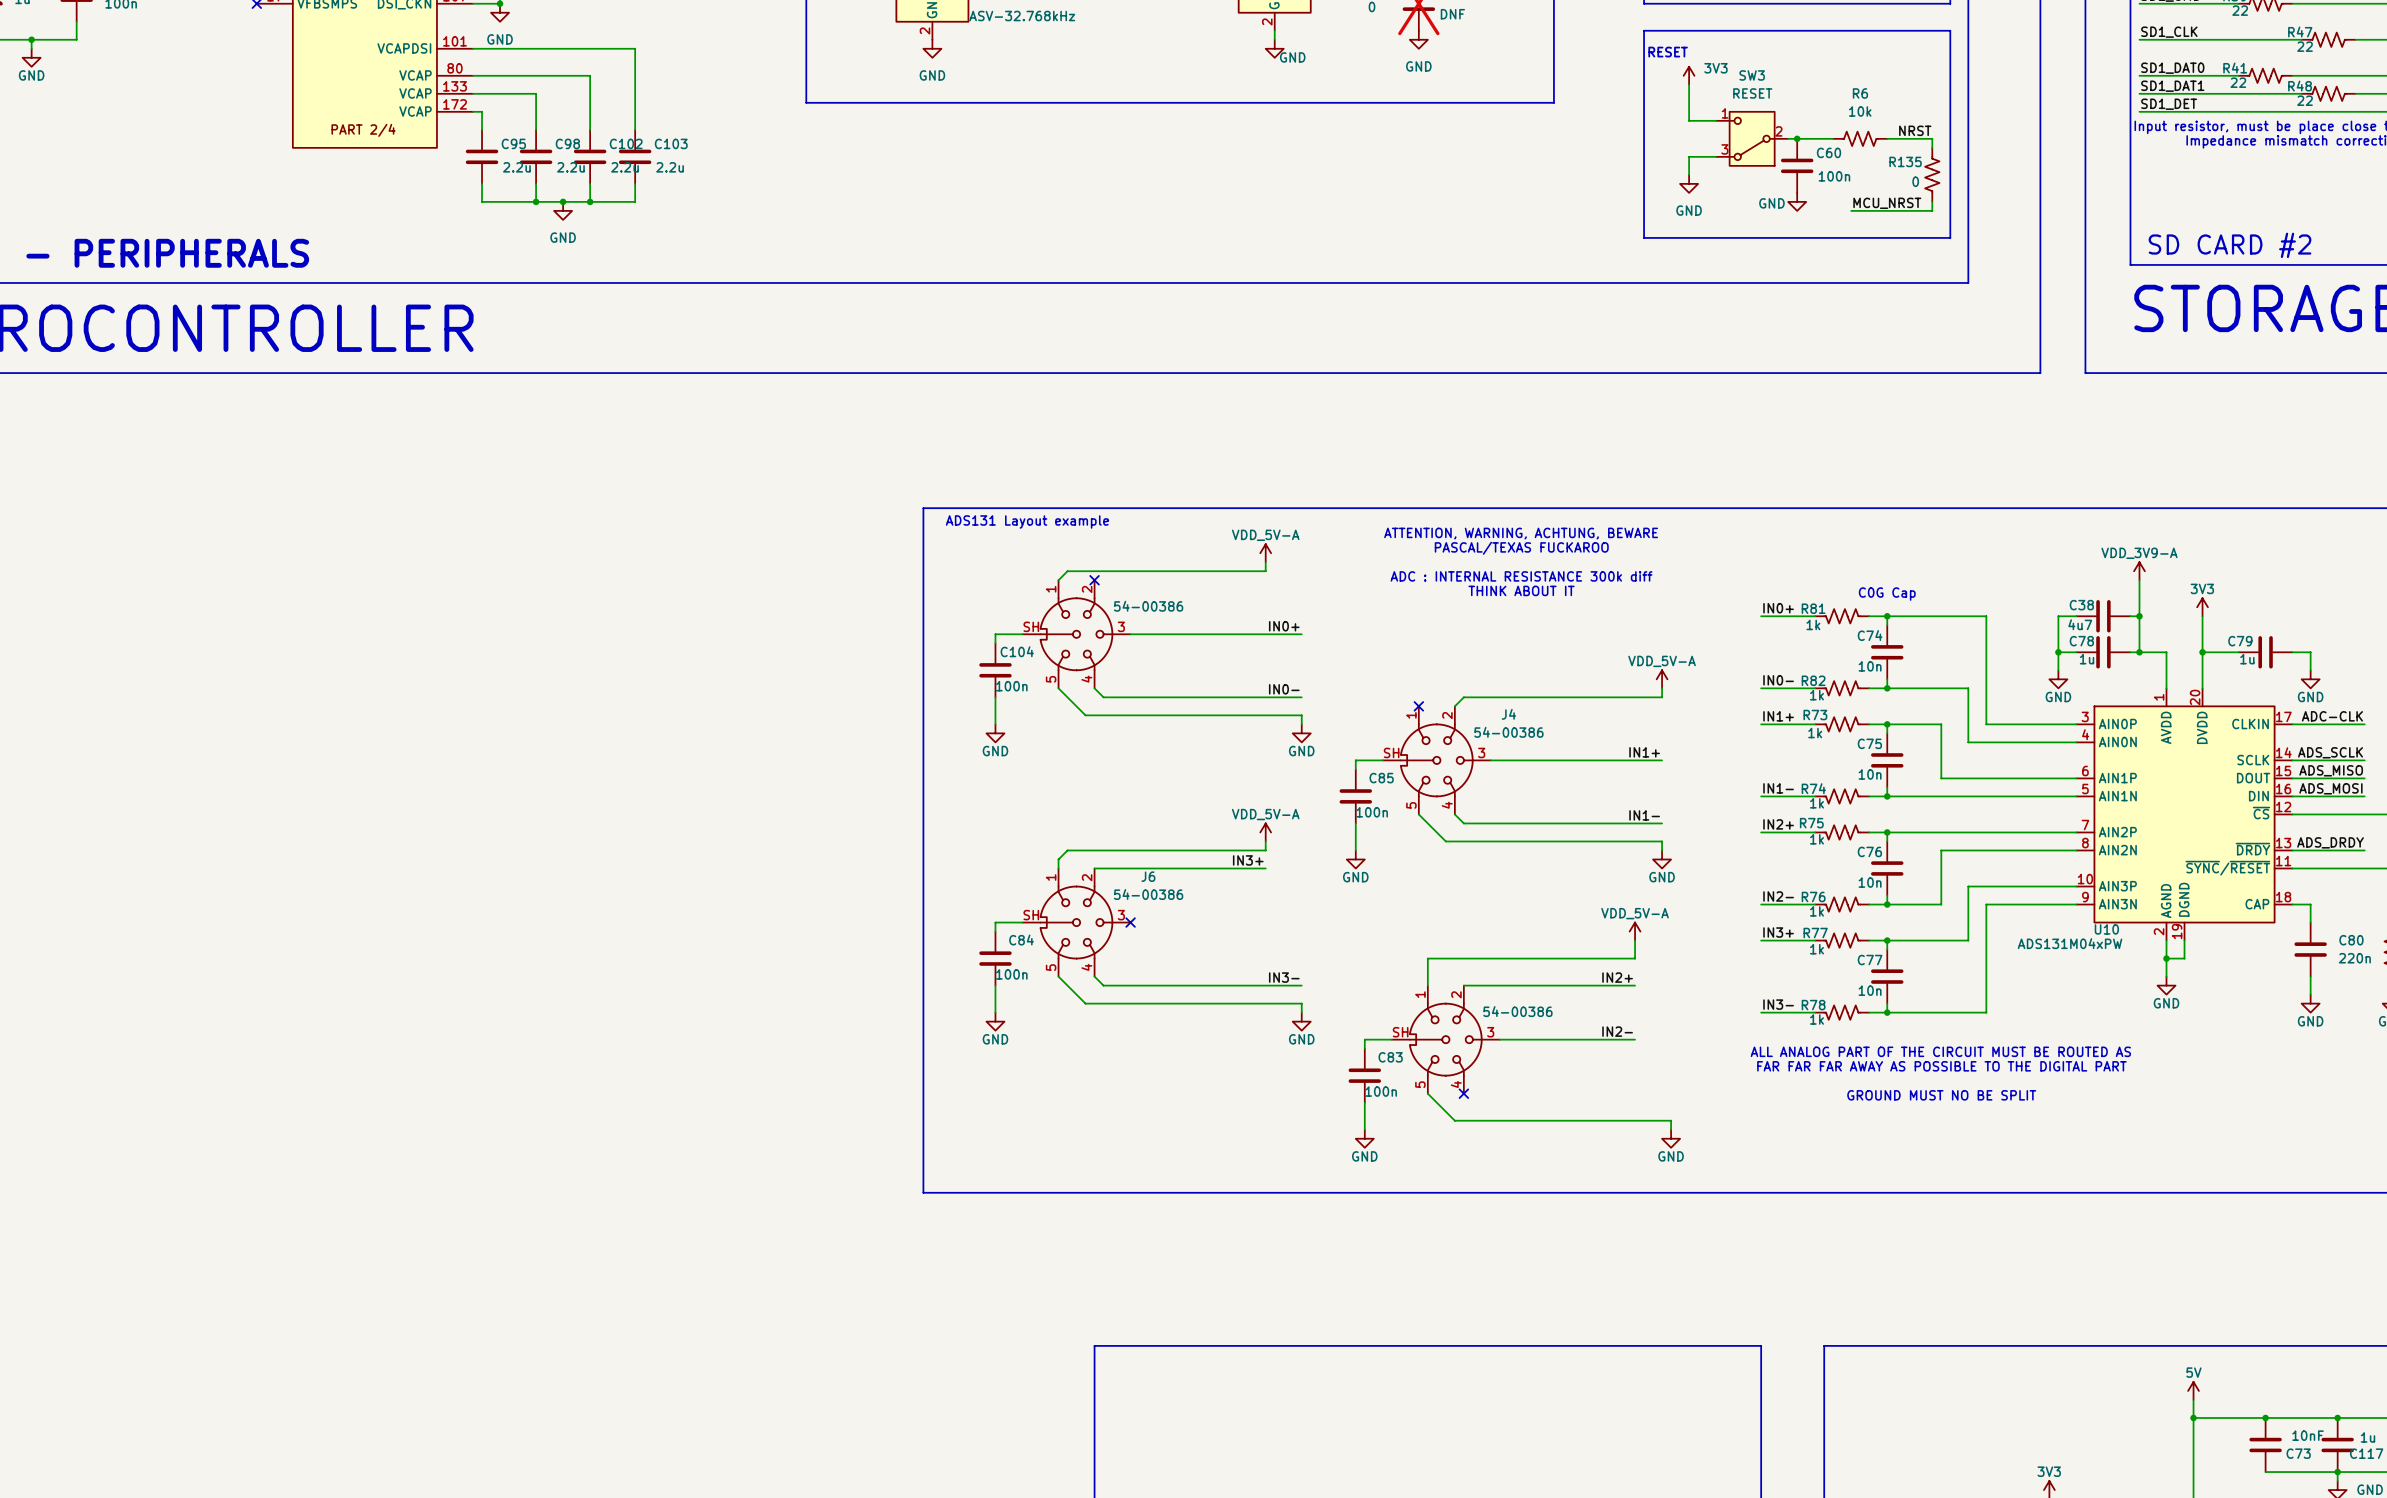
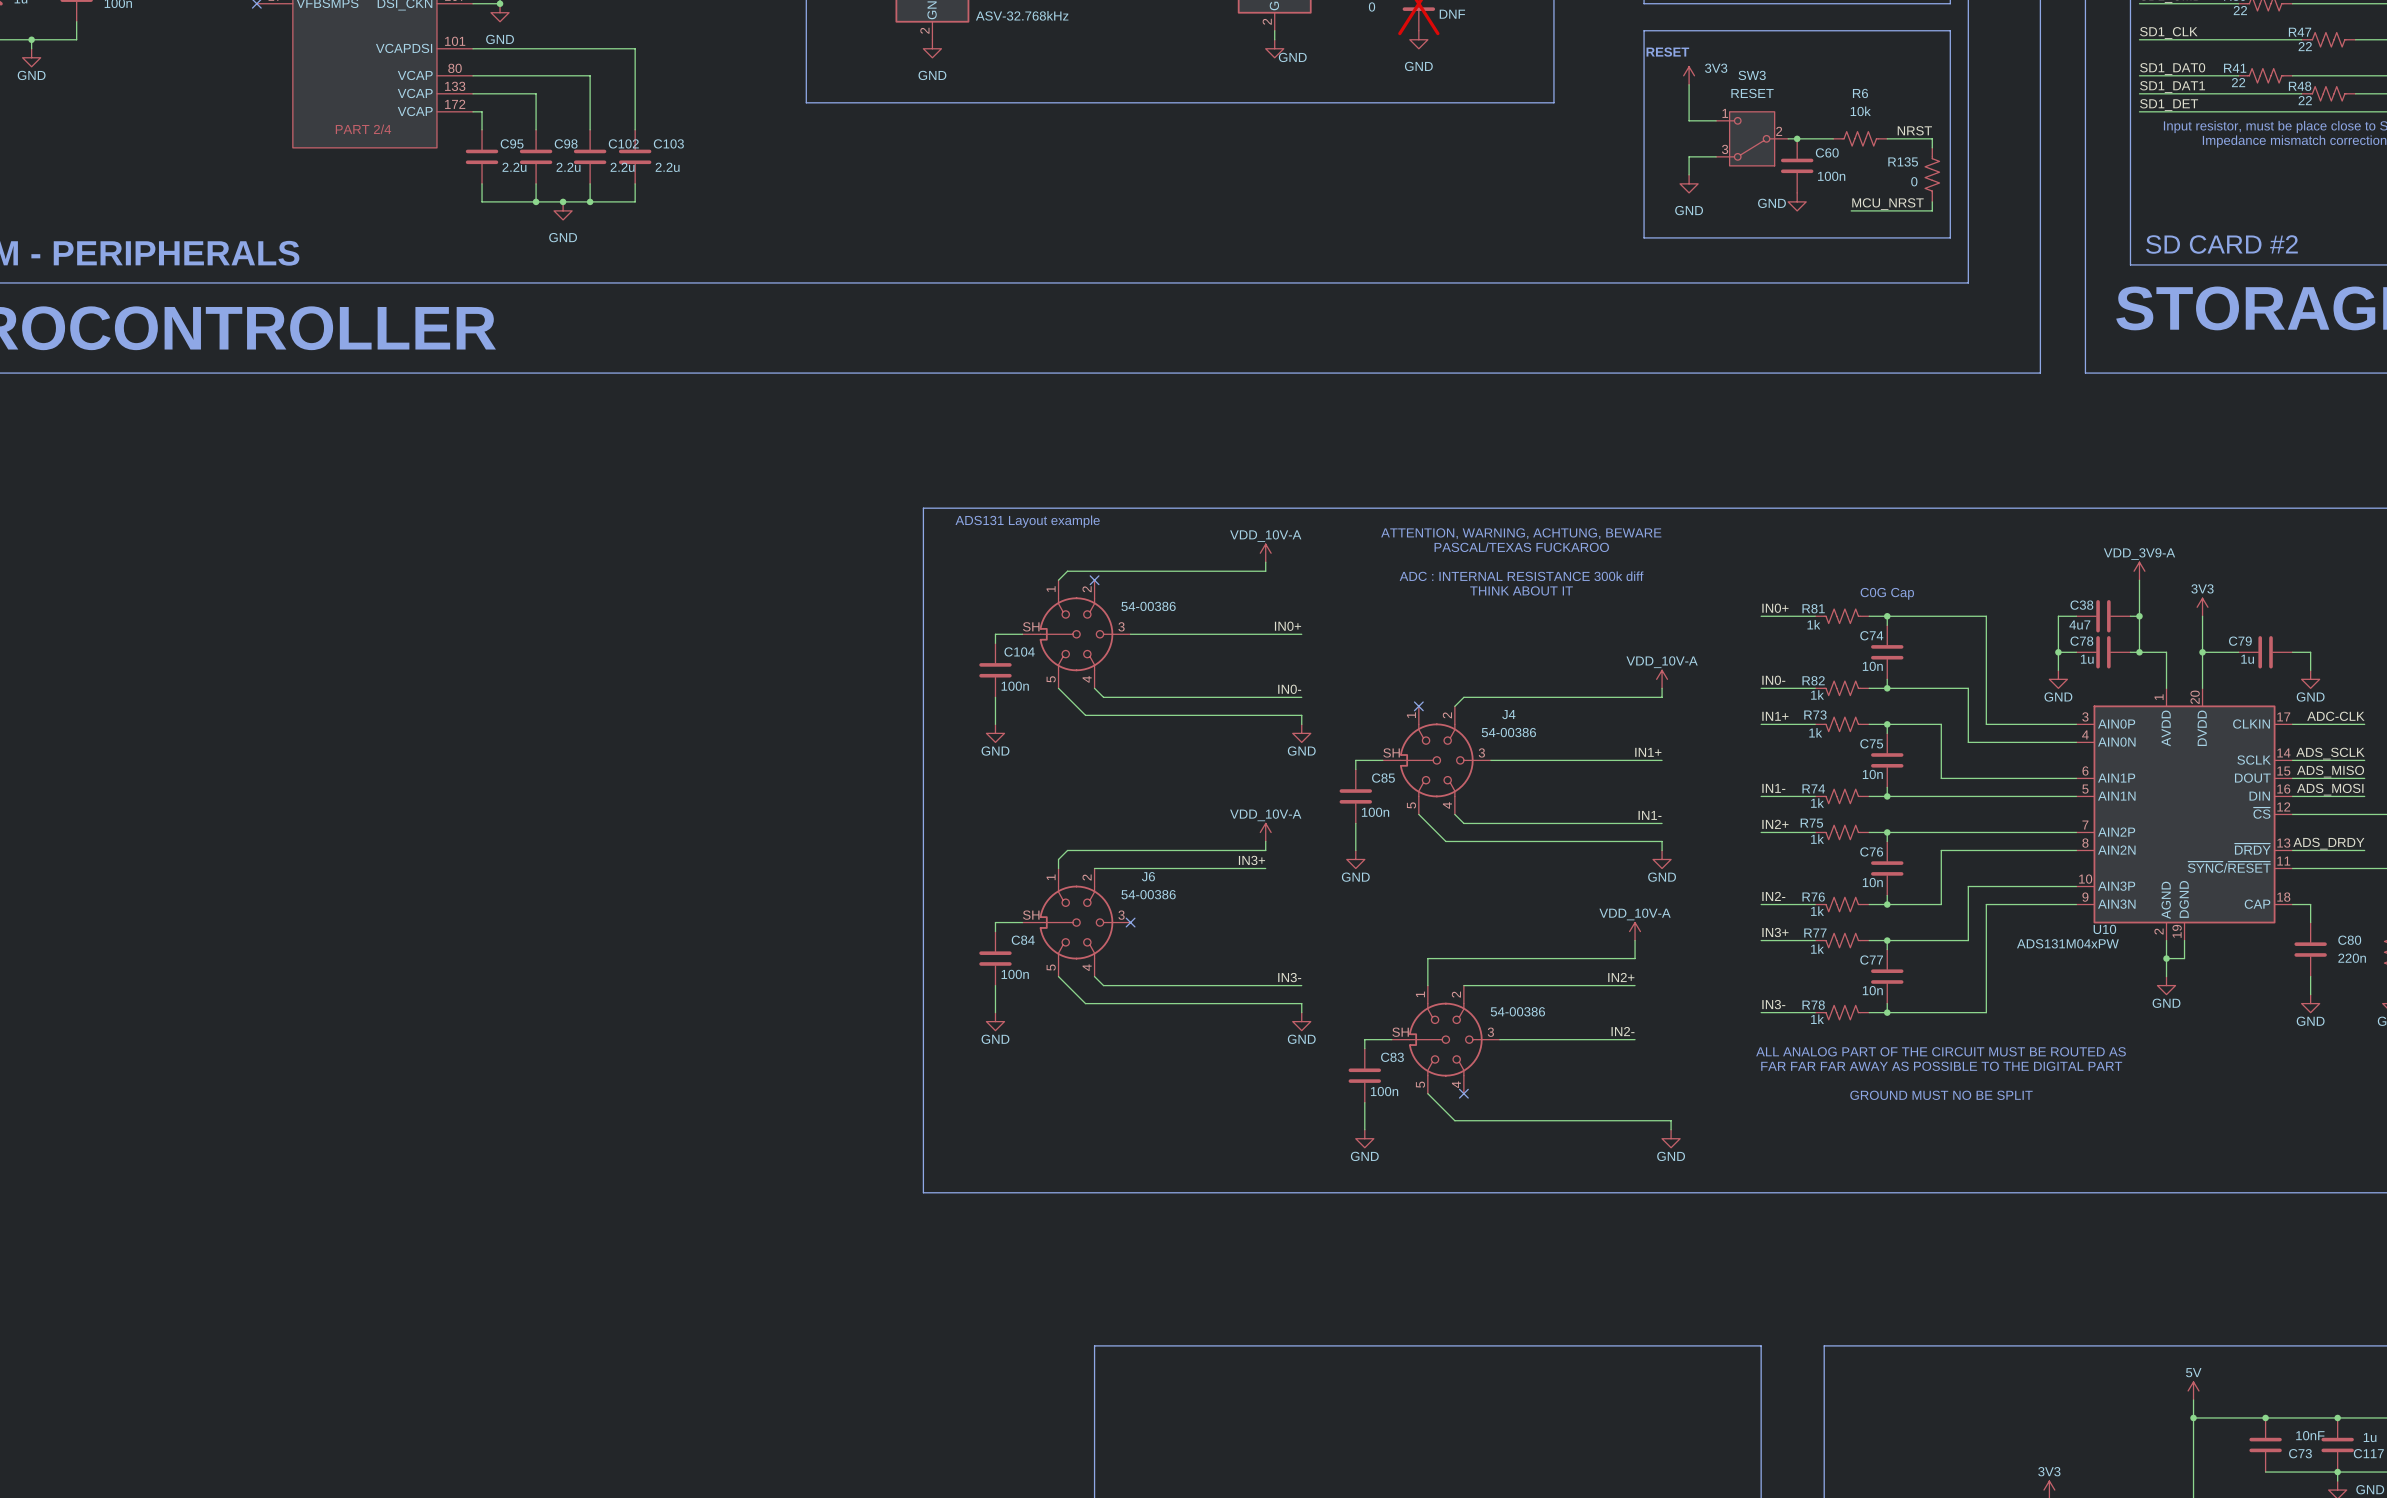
power symbol: VDD_5V-A (1265, 553) -> VDD_10V-A (1265, 553)
power symbol: VDD_5V-A (1662, 679) -> VDD_10V-A (1662, 679)
power symbol: VDD_5V-A (1265, 832) -> VDD_10V-A (1265, 832)
power symbol: VDD_5V-A (1635, 931) -> VDD_10V-A (1635, 931)

